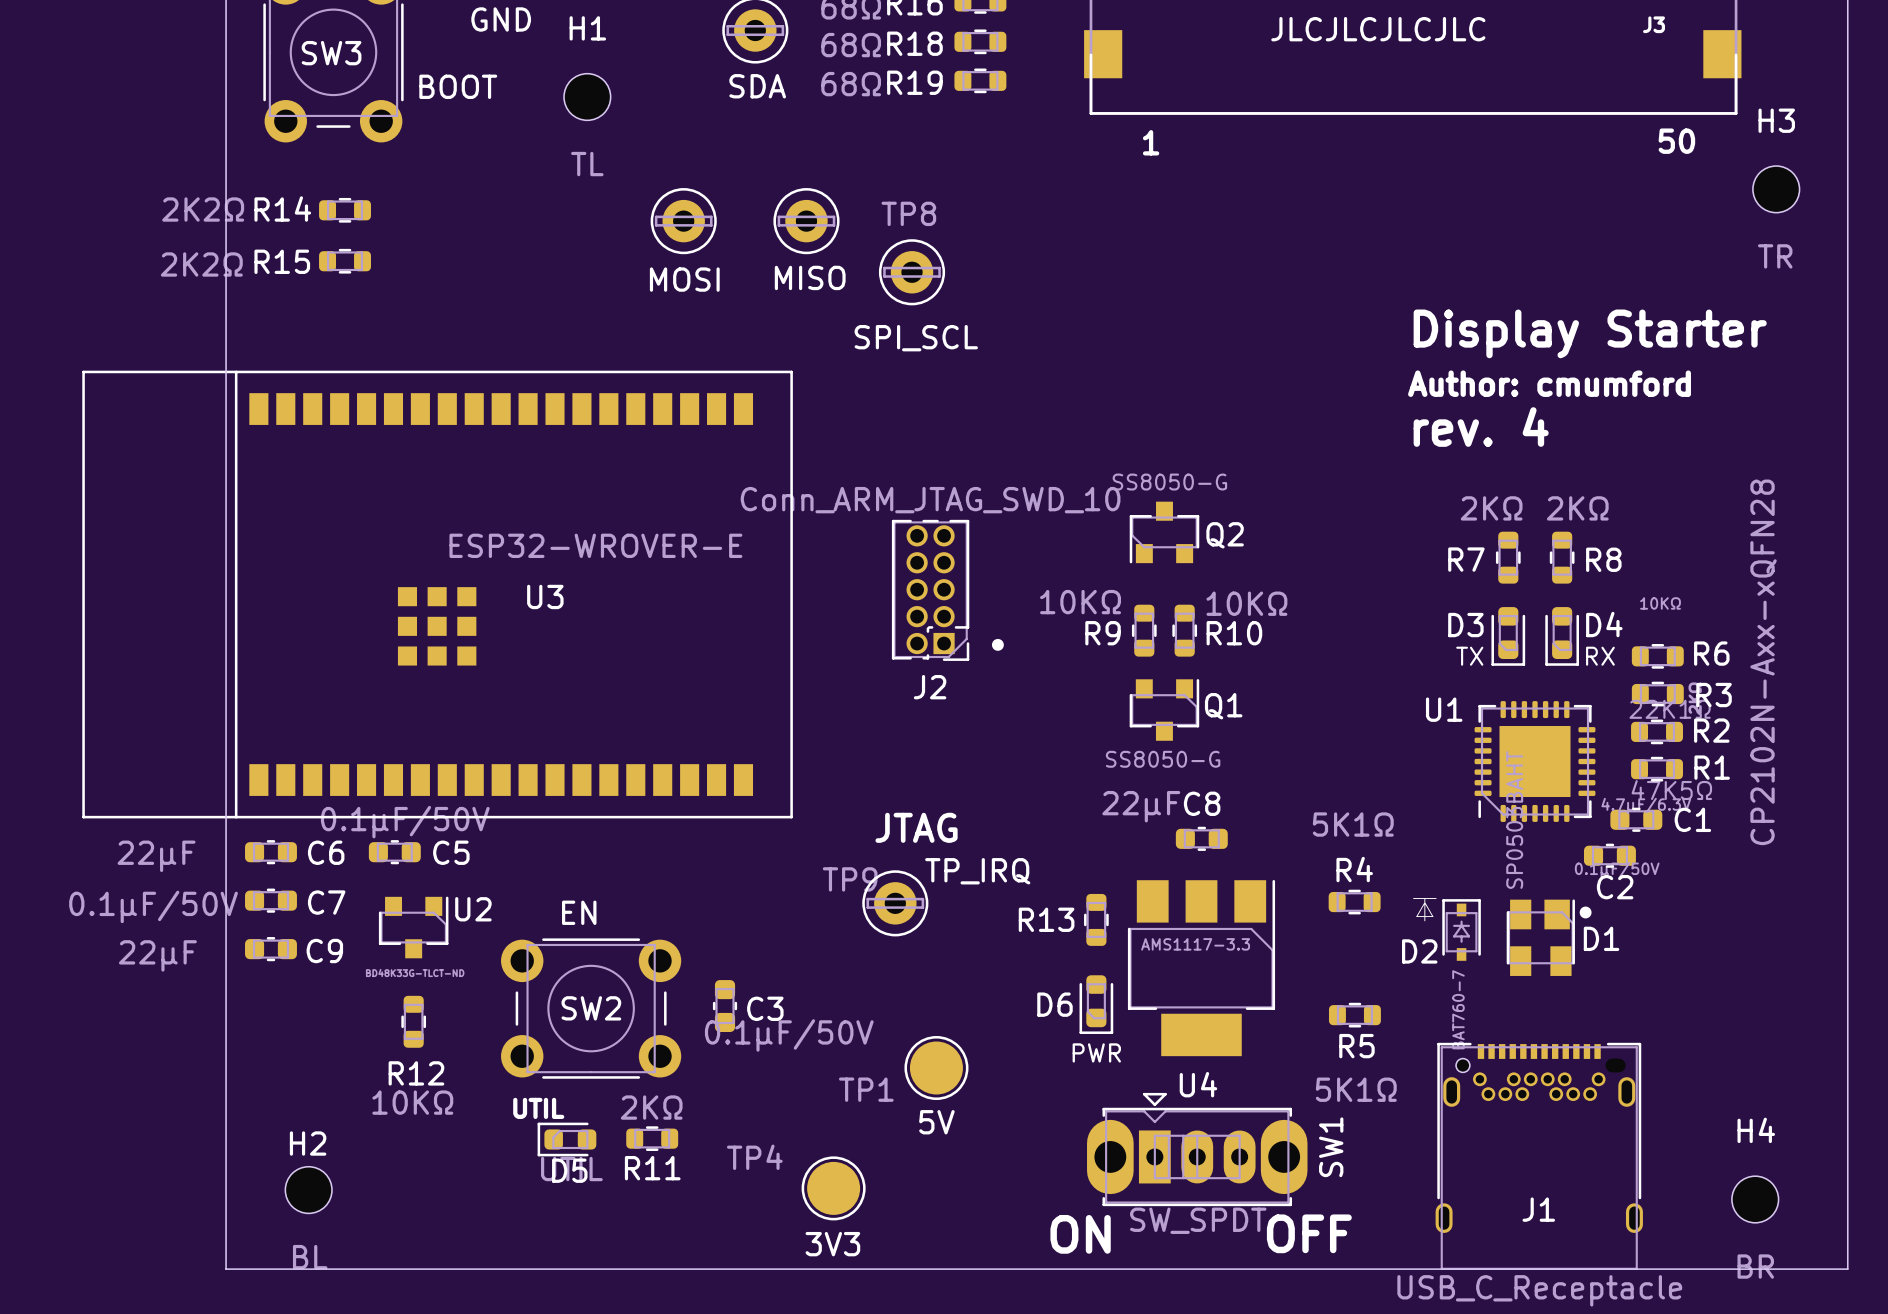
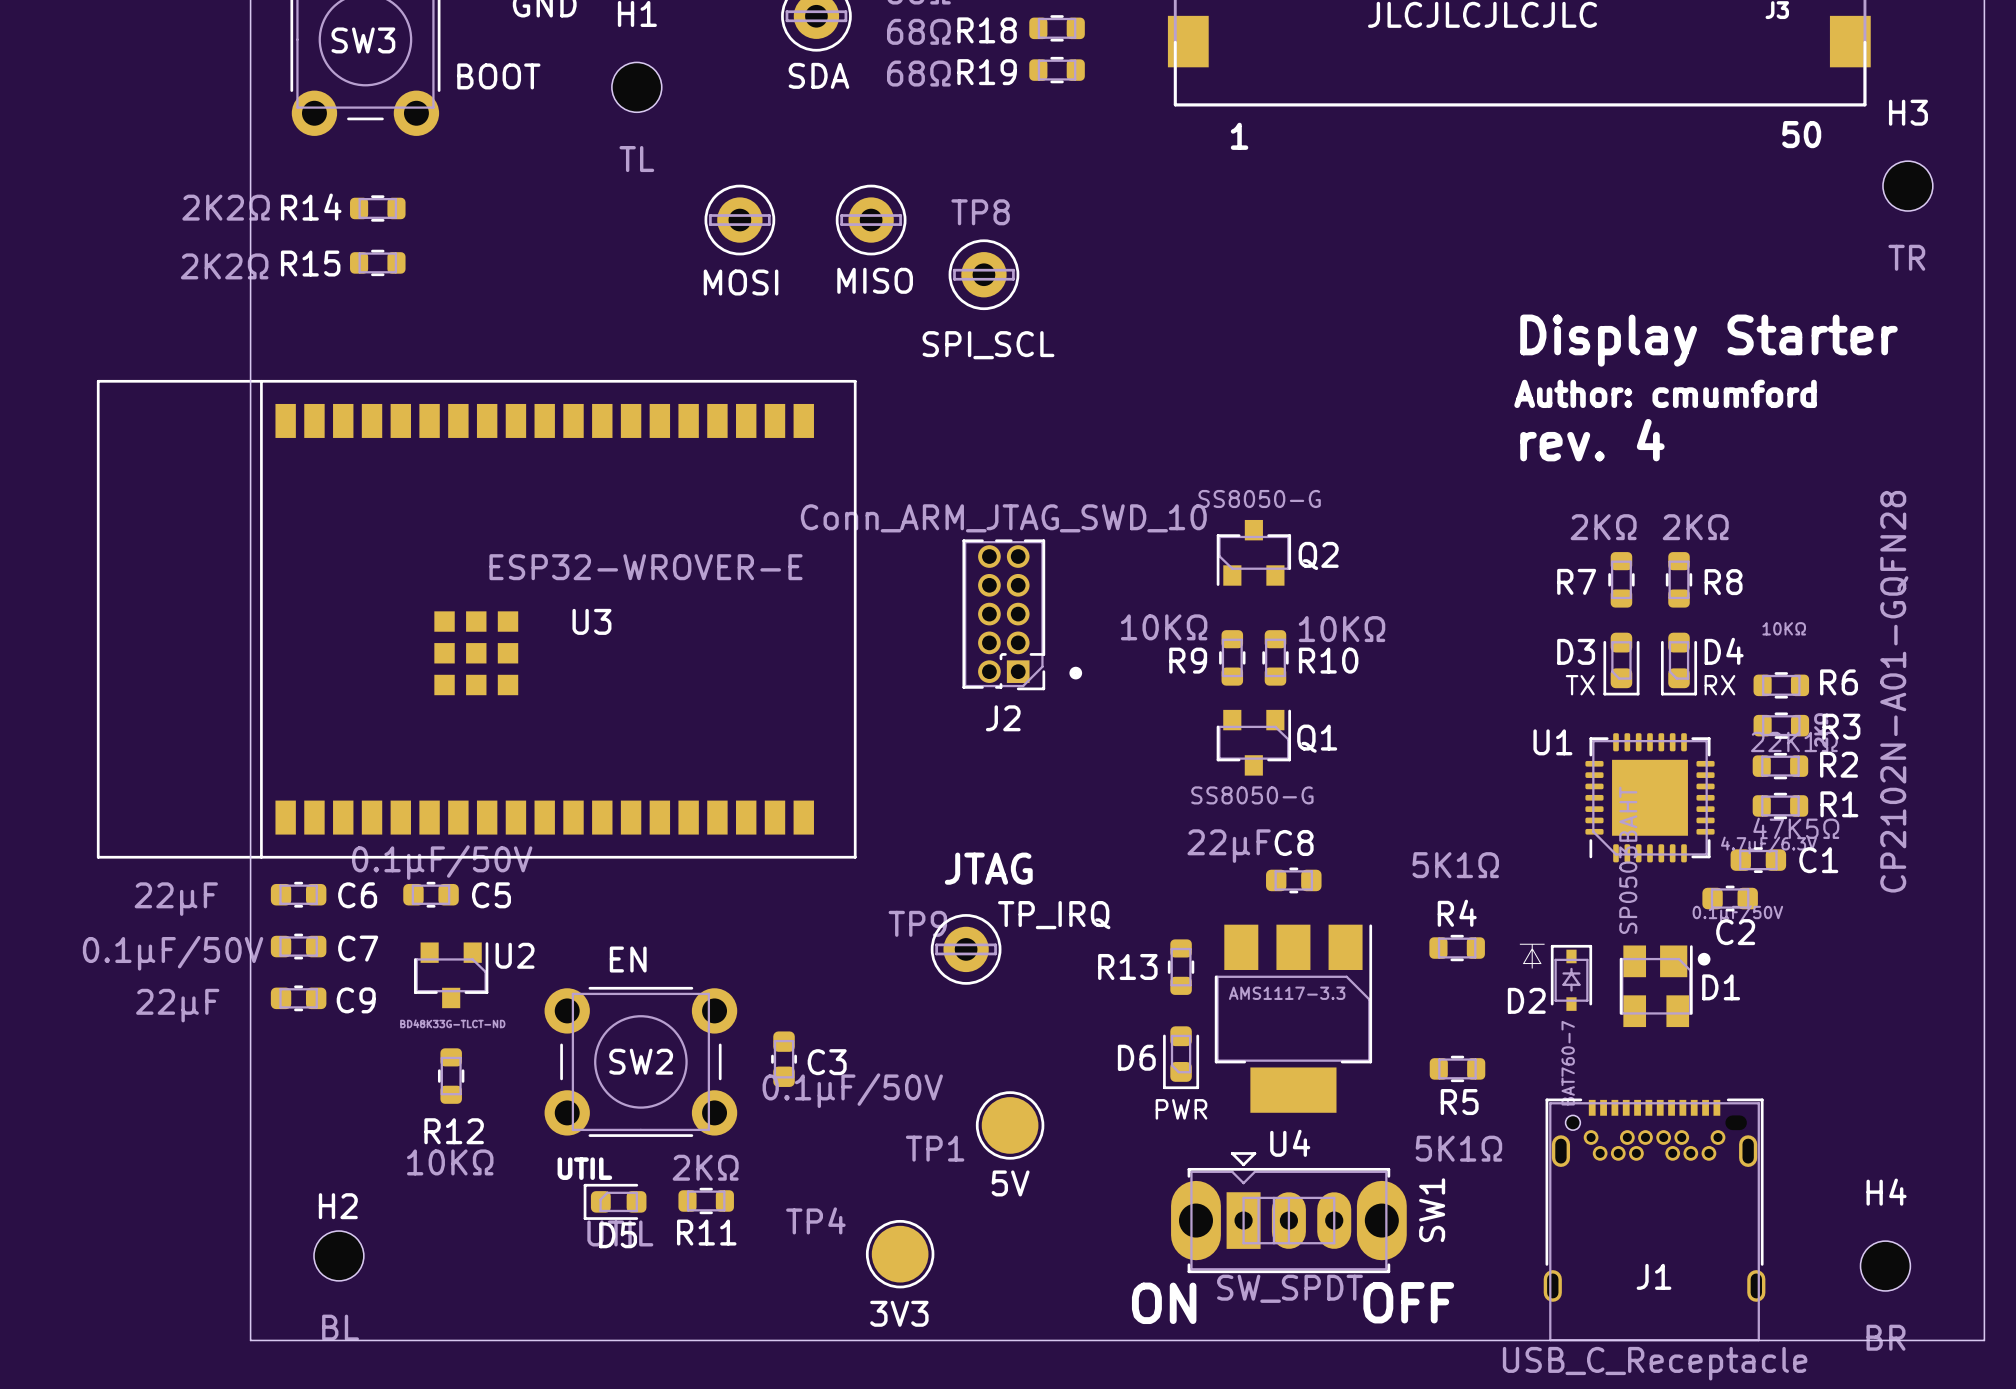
U1 value: CP2102N-Axx-xQFN28 (1763, 662) -> CP2102N-A01-GQFN28 (1894, 691)

